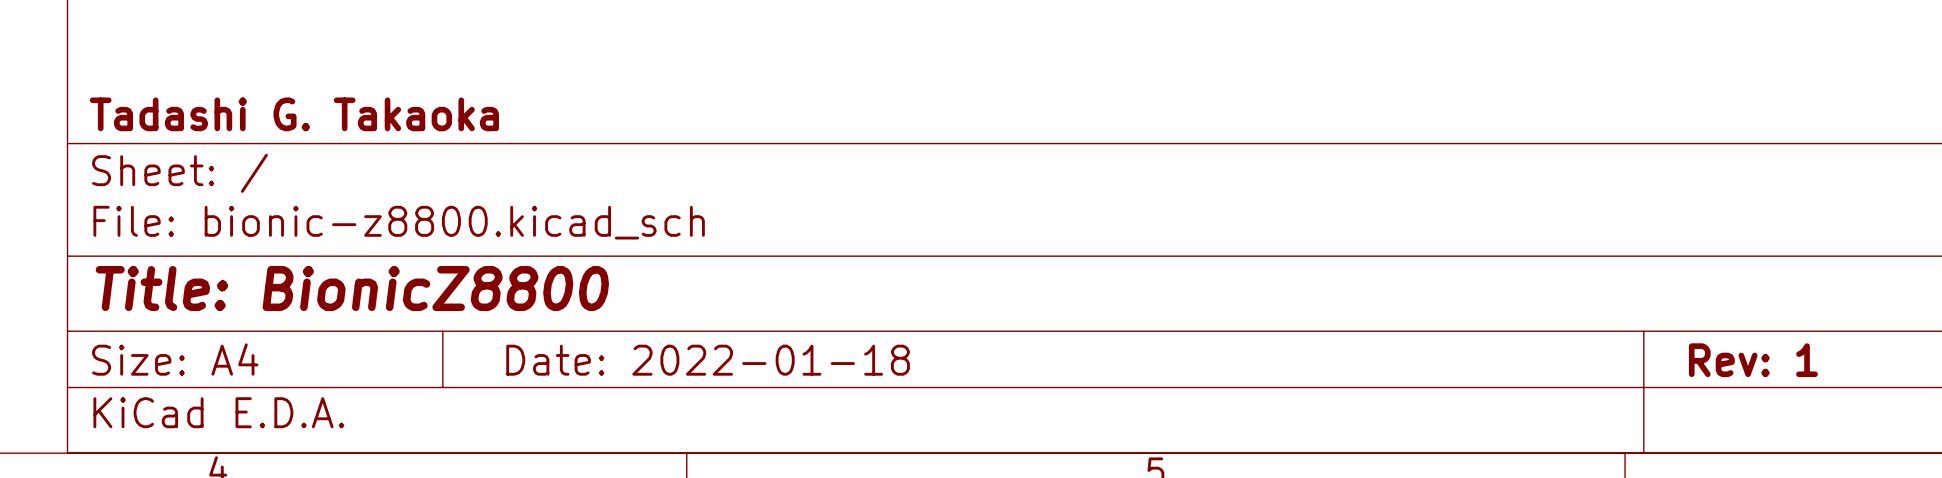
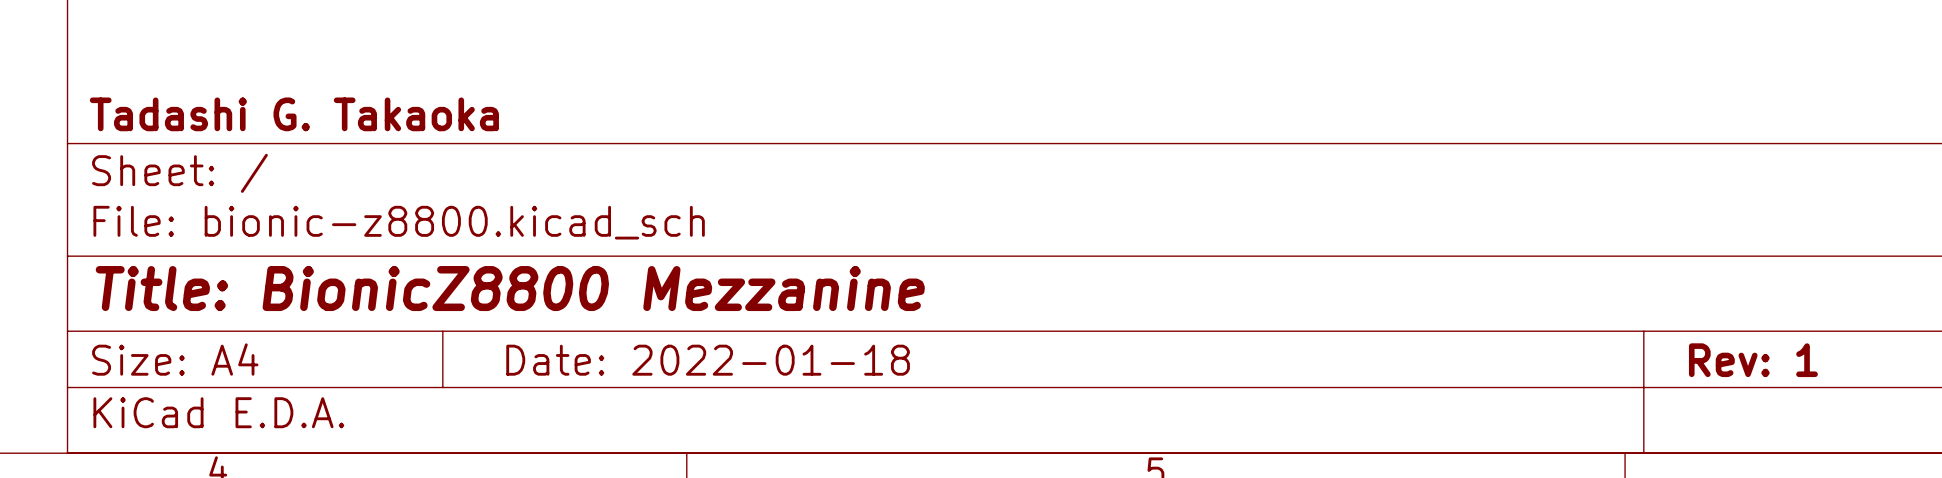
title block: Title: BionicZ8800 (352, 288) -> Title: BionicZ8800 Mezzanine (510, 288)

